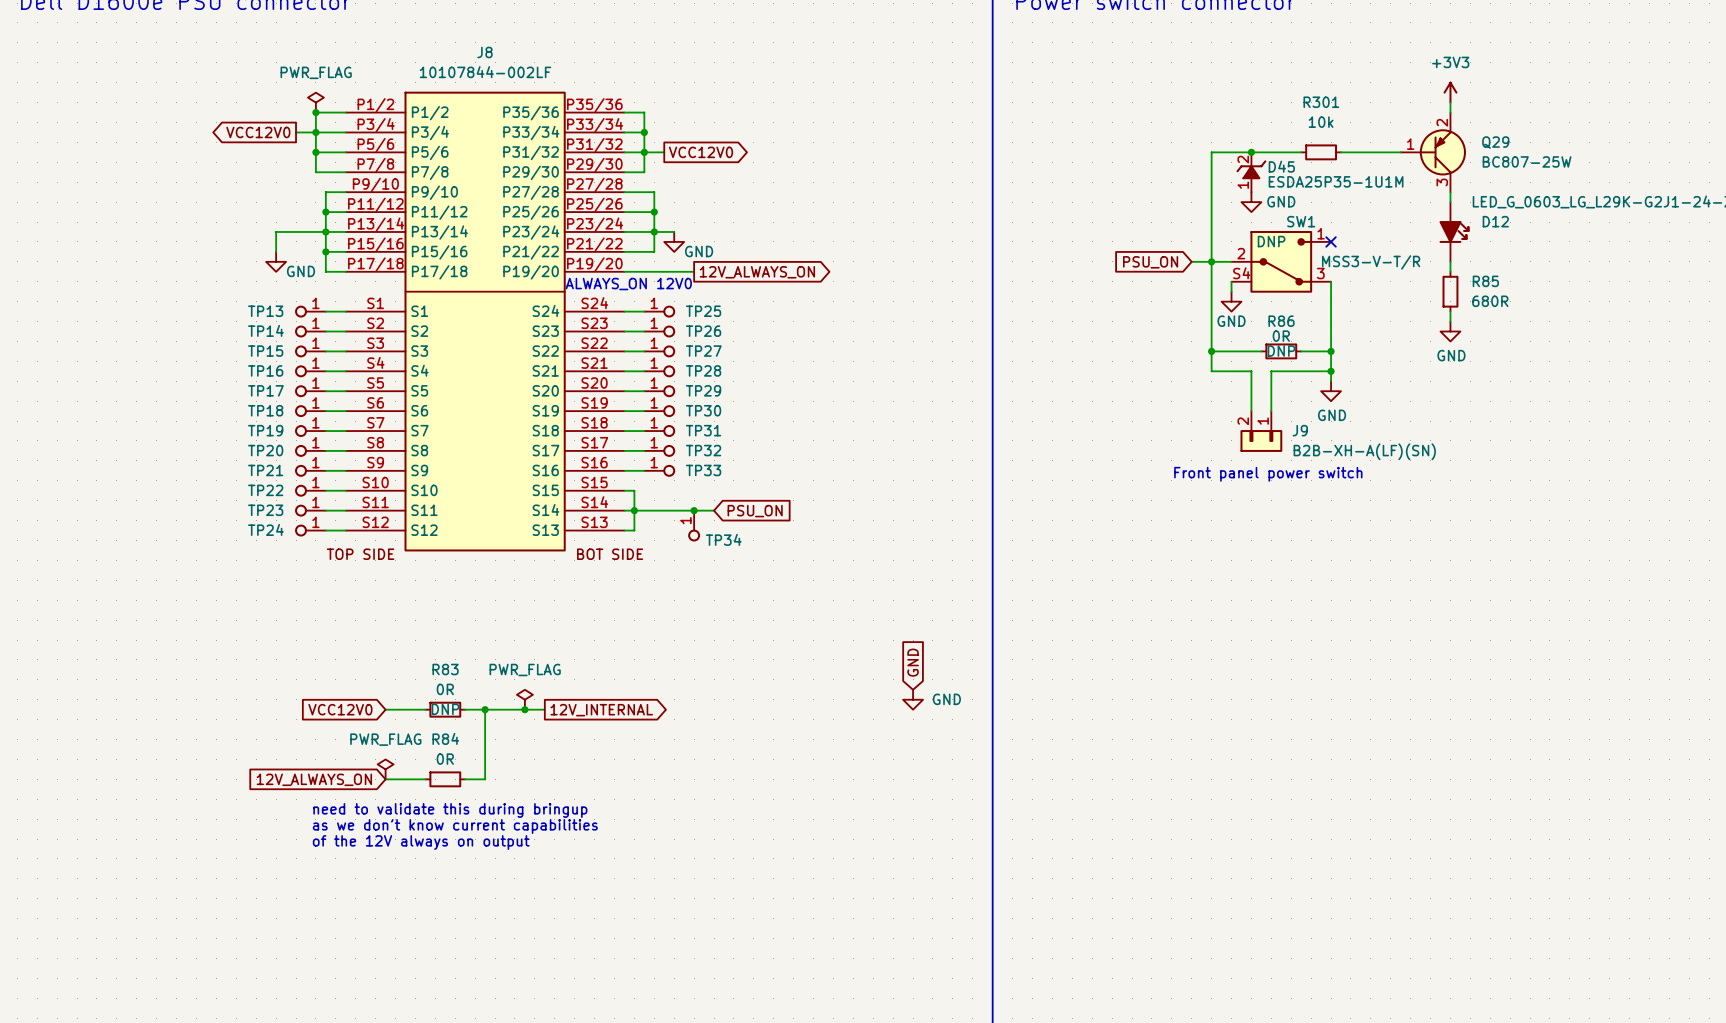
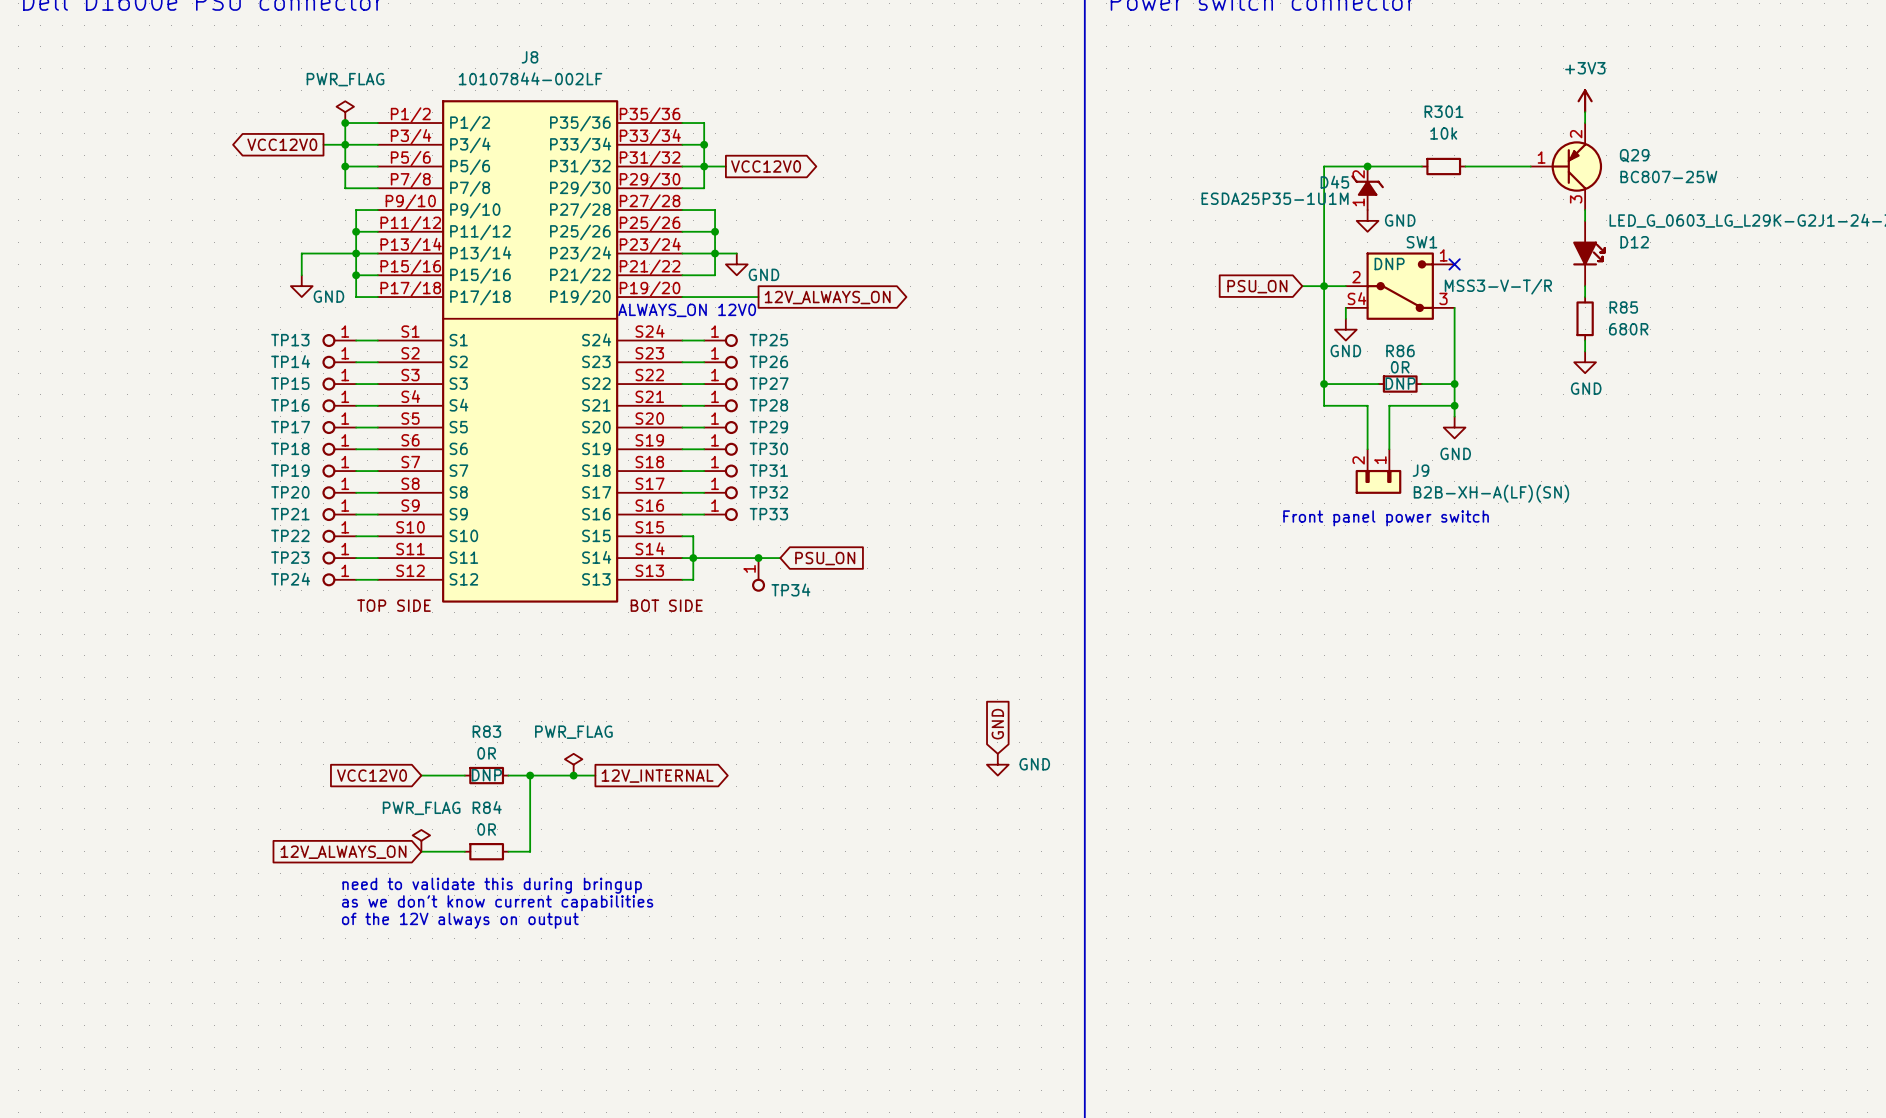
D45 flip: as is (1251, 169) -> left-right (1367, 185)

